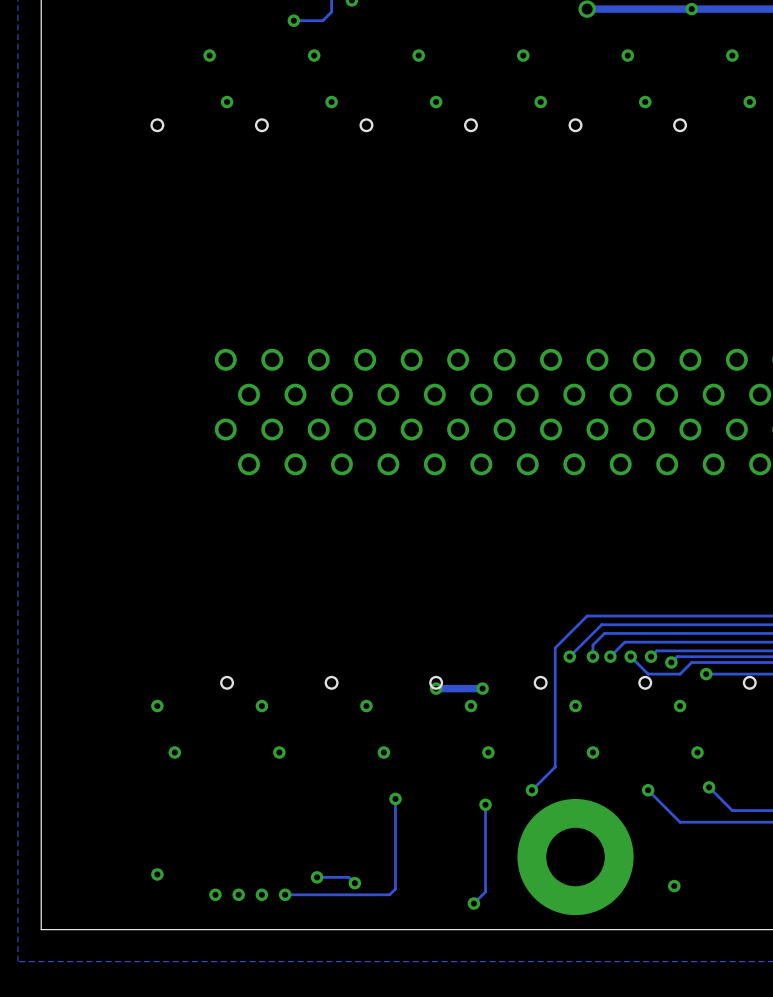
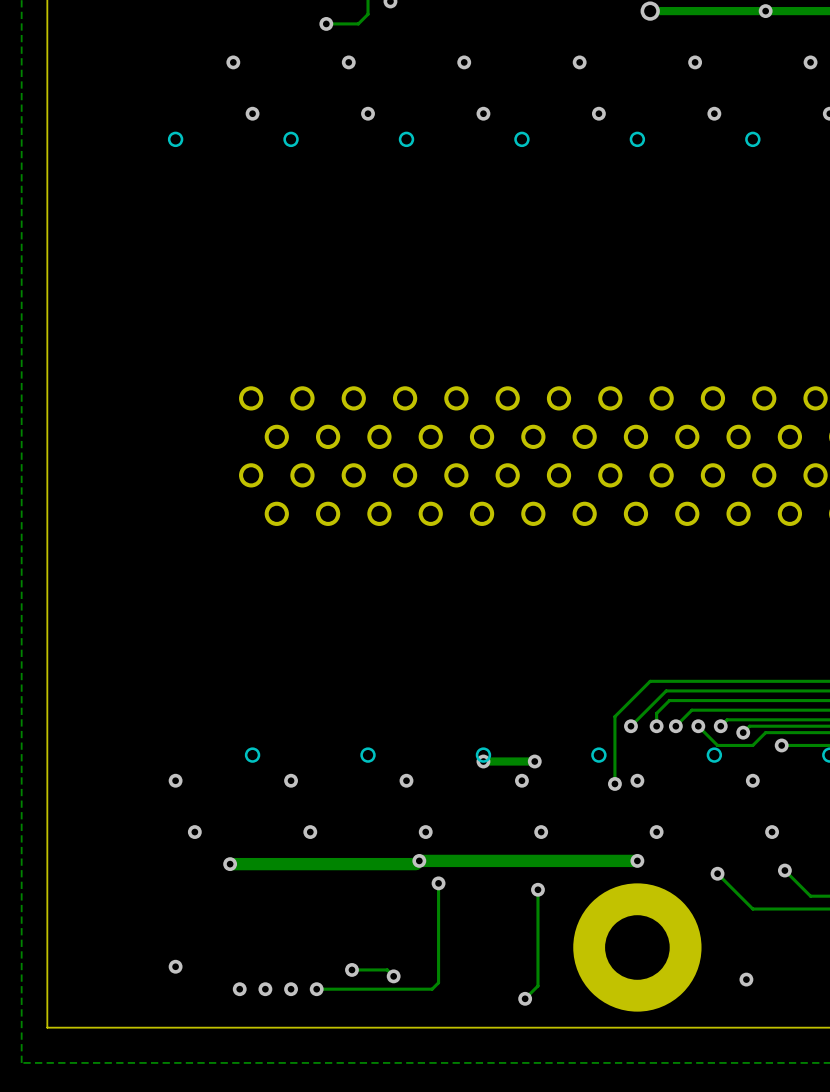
track: (555, 708) (555, 767) (531, 790) -> none
via: none -> (614, 783)
via: none -> (419, 860)
track: none -> (637, 860) (419, 860) (416, 864) (230, 864)
via: none -> (637, 860)
via: none -> (230, 864)
via: (531, 790) -> none

